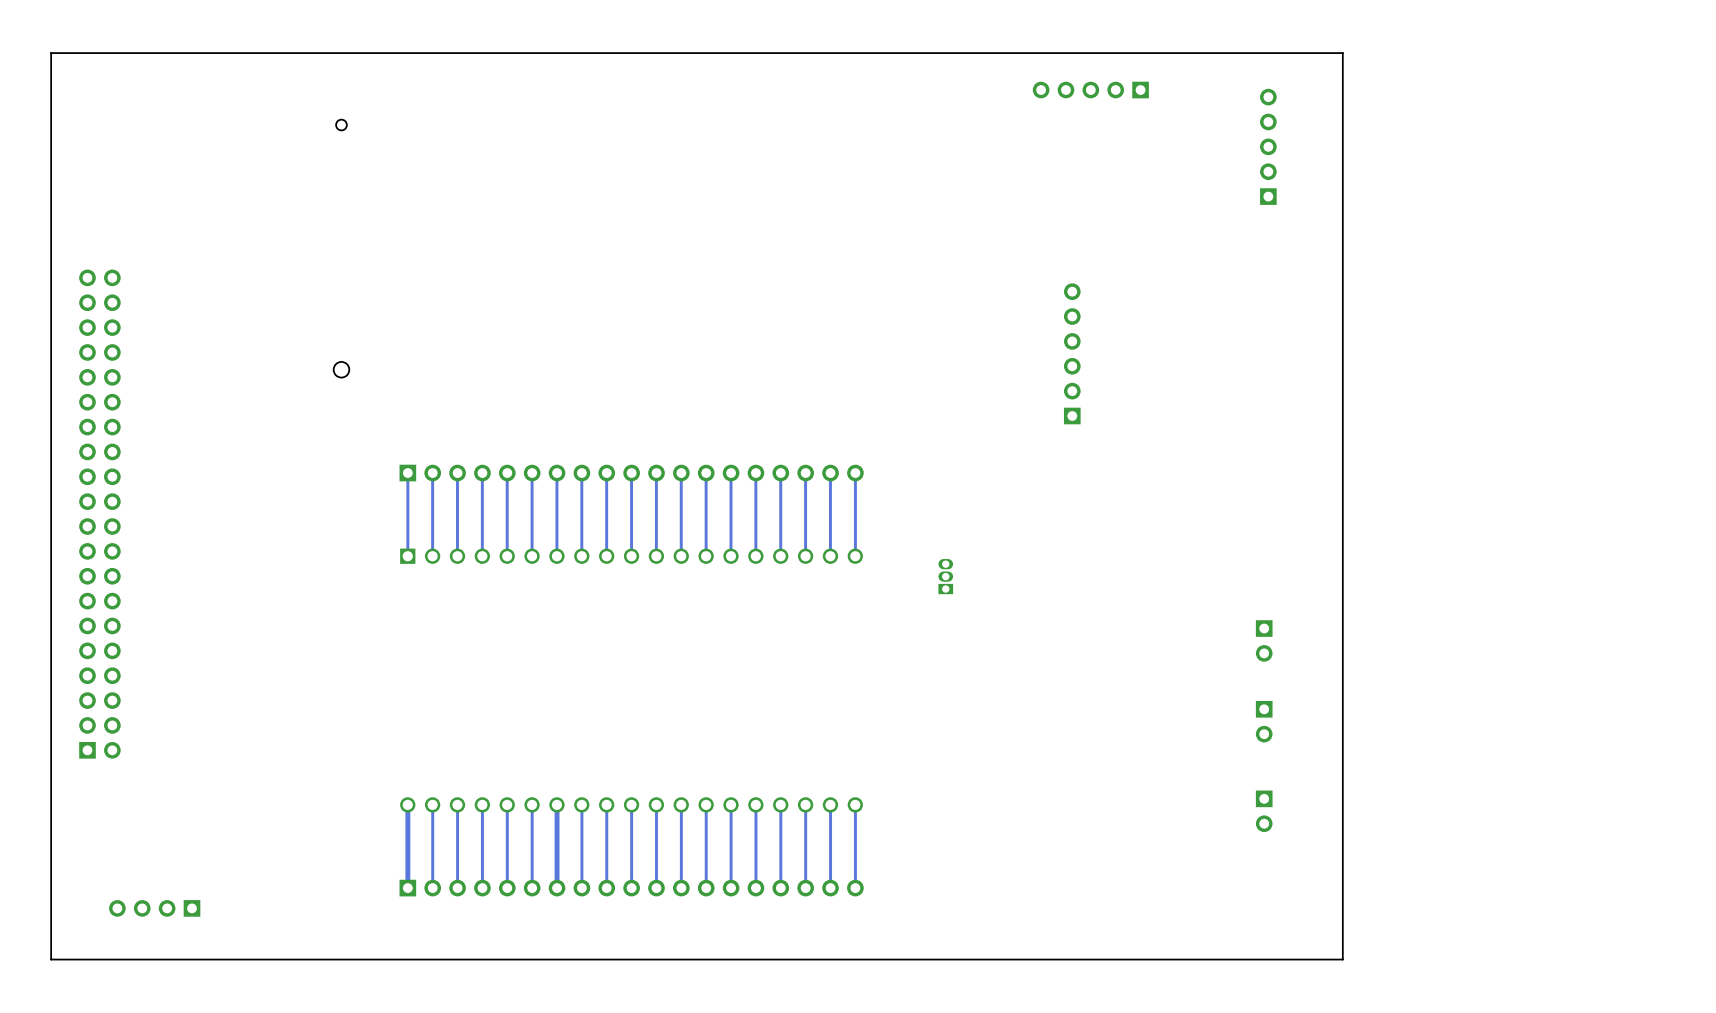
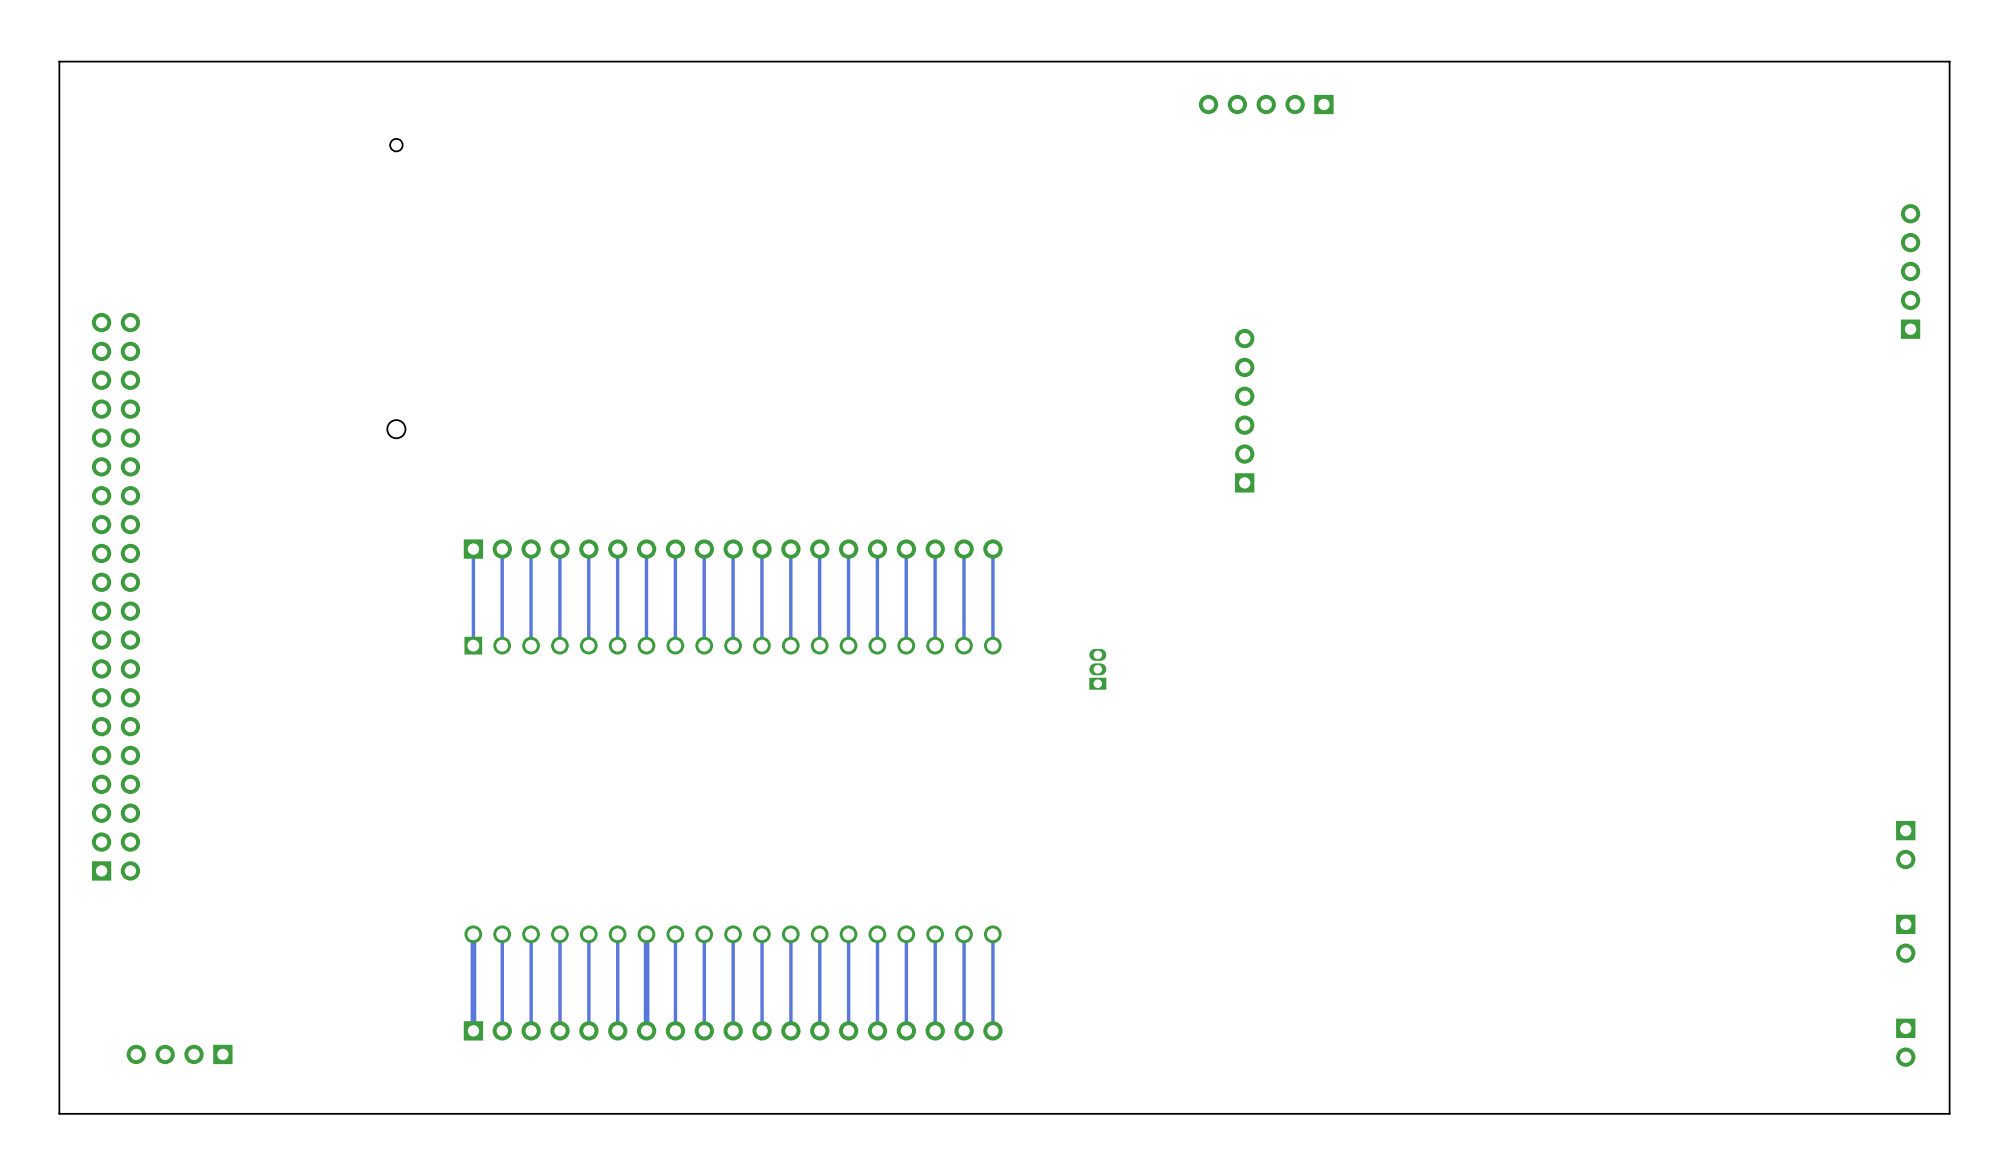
board edge: (1342, 53) (1342, 959) -> (1558, 61) (1949, 61) (1949, 1113) (1558, 1113)
part: (1268, 146) -> none
part: none -> (1910, 271)
part: (1264, 640) -> none
part: (1264, 721) -> none
part: none -> (1905, 845)
part: none -> (1905, 938)
part: (1264, 811) -> none
part: none -> (1905, 1042)

